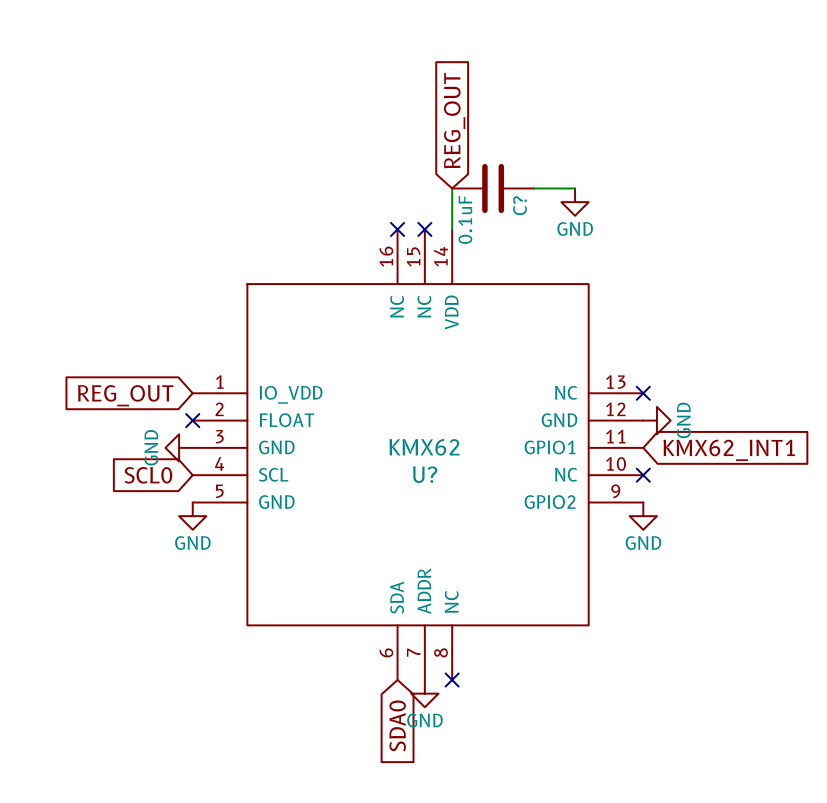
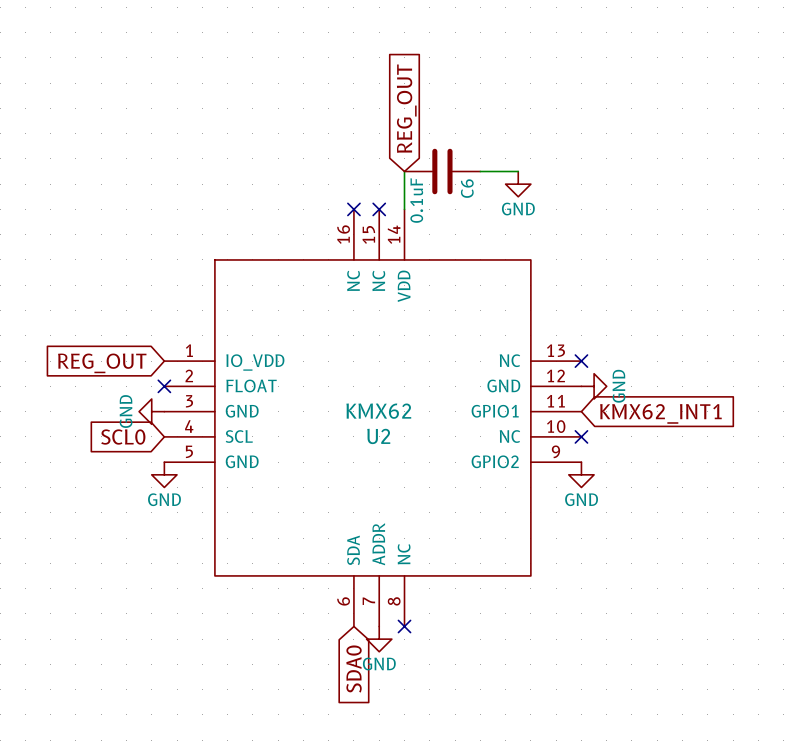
C? name: C? (520, 205) -> C6 (467, 188)
U? name: U? (425, 474) -> U2 (378, 436)

